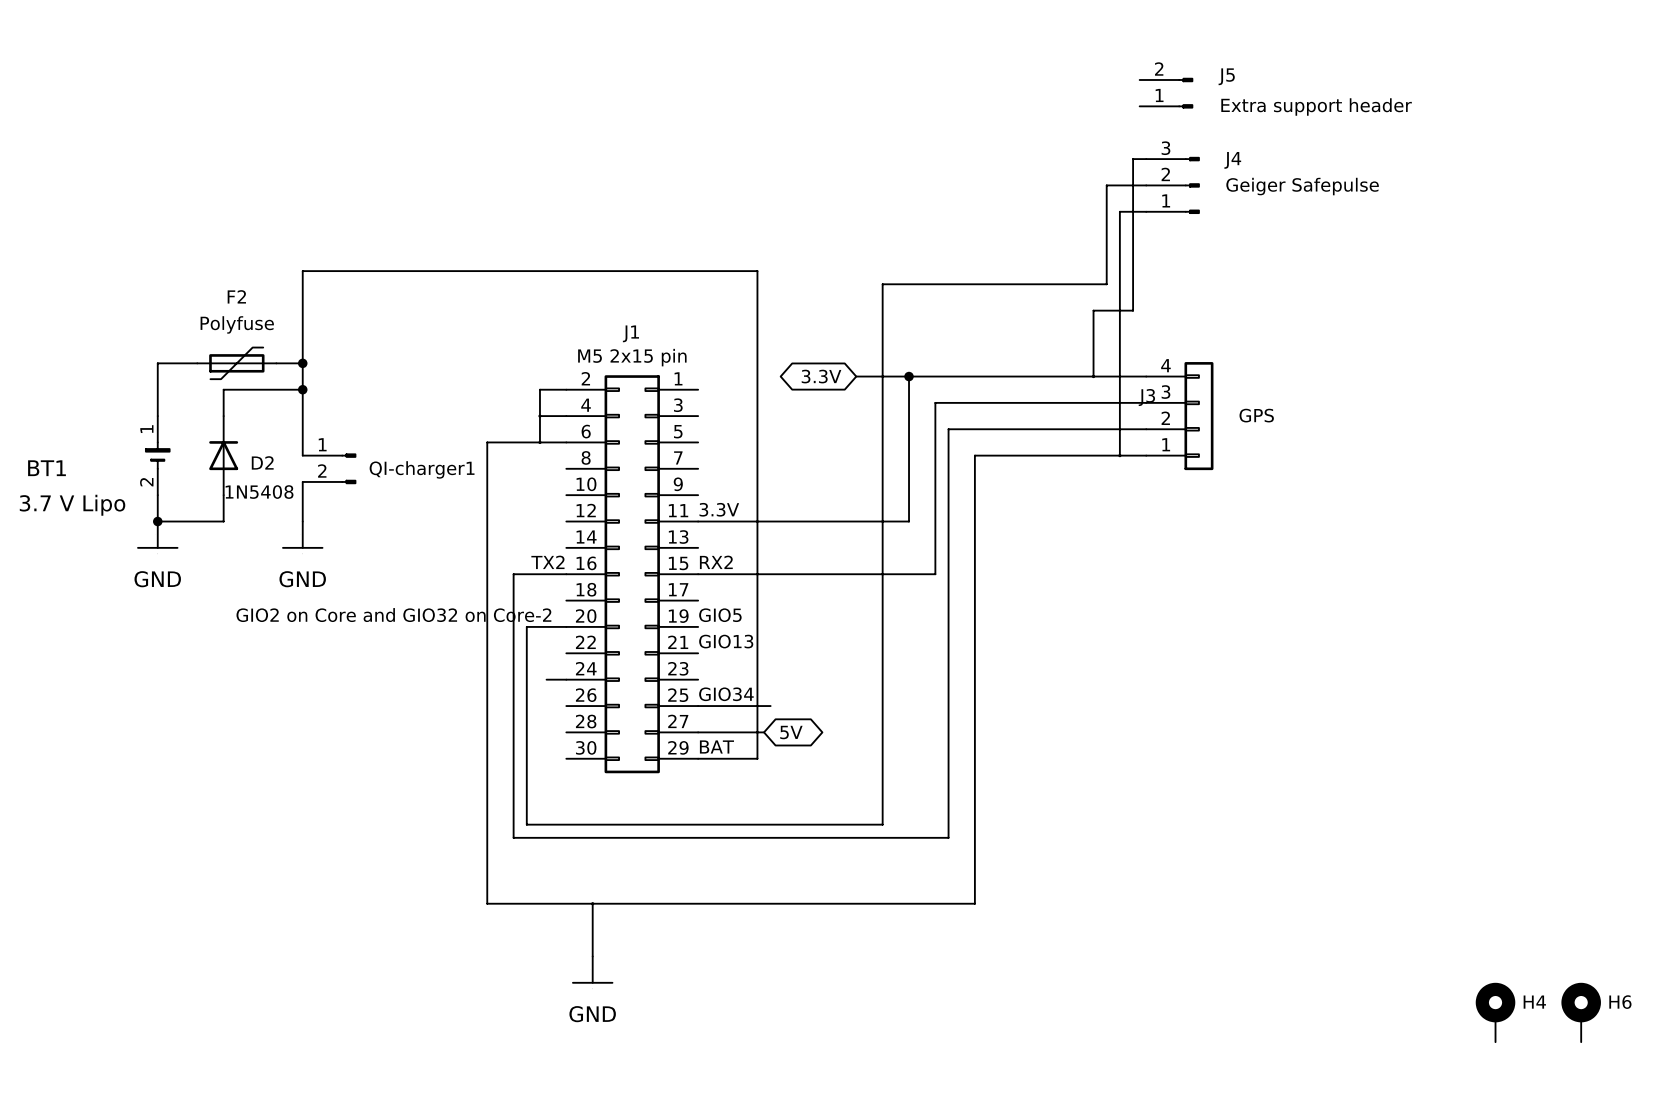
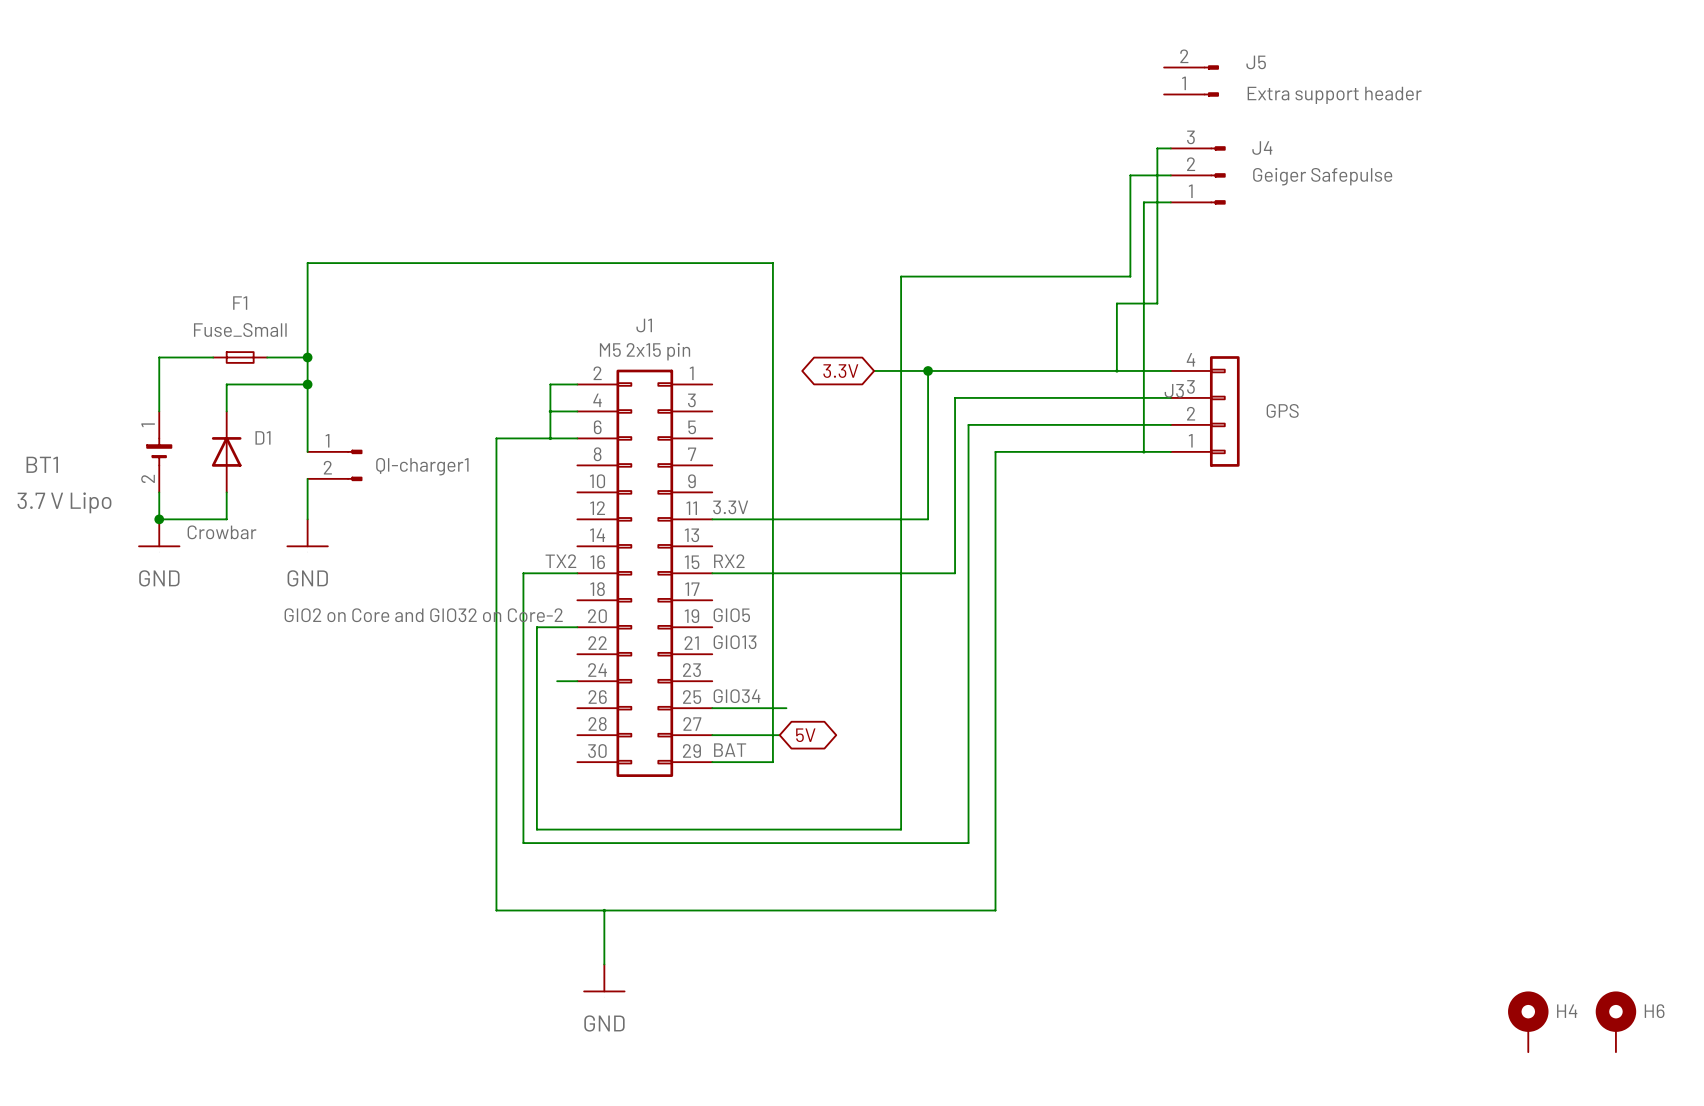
F2: Polyfuse (236, 363) -> none
F1: none -> Fuse_Small (240, 357)
D2 name: D2 (262, 462) -> D1 (263, 437)
D2 value: 1N5408 (259, 492) -> Crowbar (222, 532)

